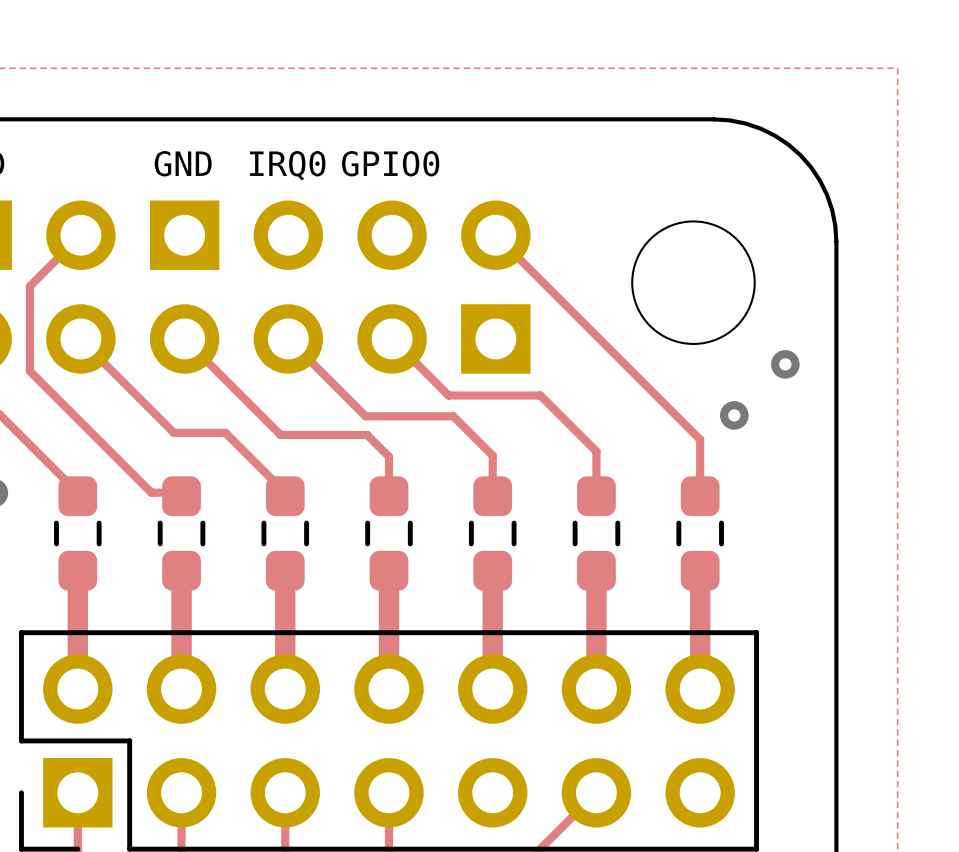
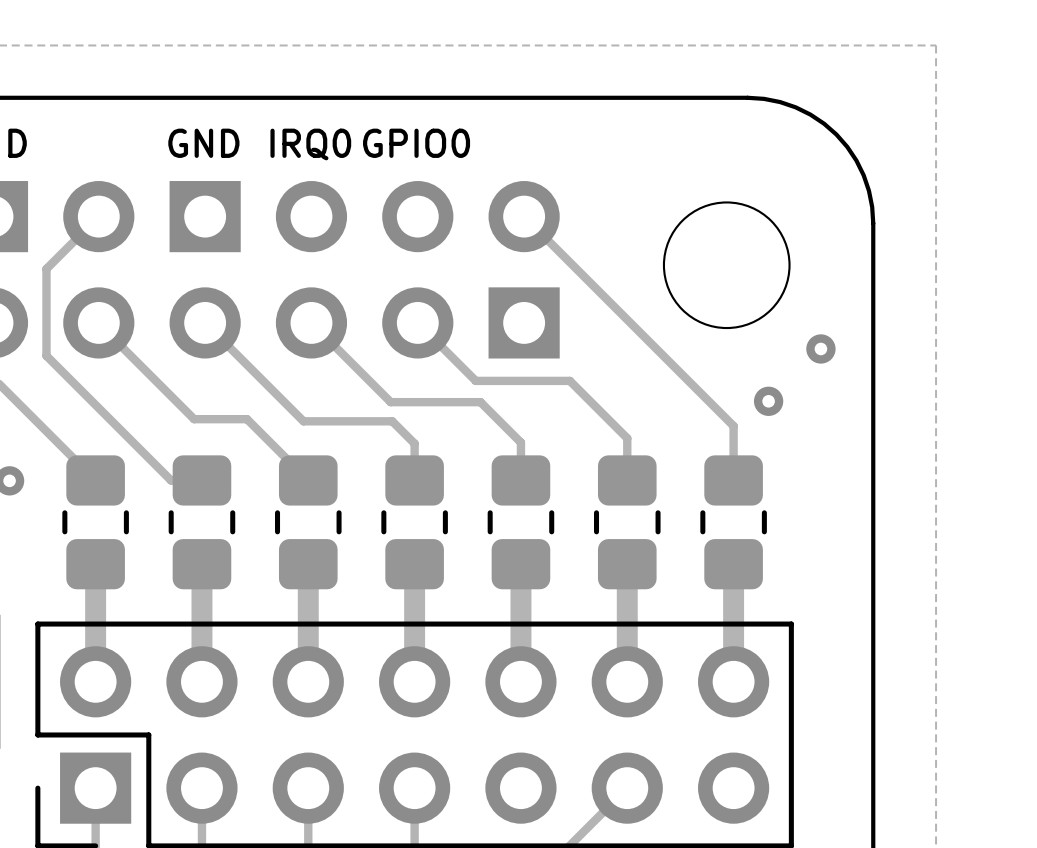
part footprint: [54, 476, 102, 591] -> [62, 455, 129, 590]
part footprint: [157, 476, 206, 591] -> [168, 455, 236, 590]
part footprint: [261, 476, 310, 591] -> [275, 455, 342, 590]
part footprint: [365, 476, 413, 591] -> [381, 455, 448, 590]
part footprint: [468, 476, 517, 591] -> [487, 455, 555, 590]
part footprint: [572, 476, 621, 591] -> [593, 455, 661, 590]
part footprint: [676, 476, 724, 591] -> [700, 455, 767, 590]

